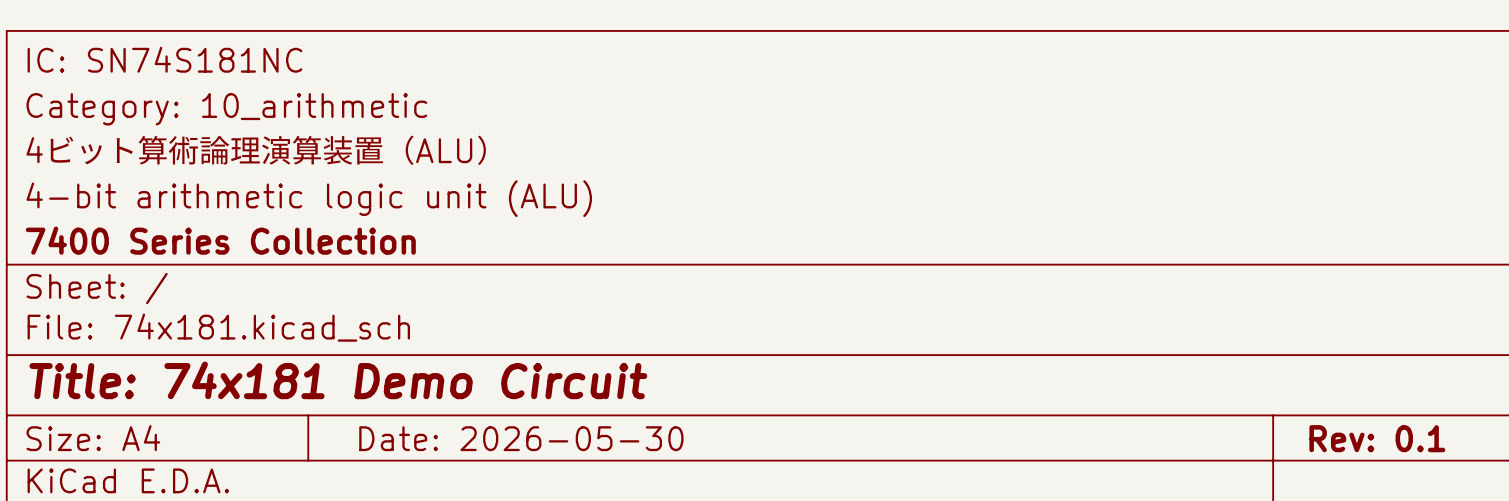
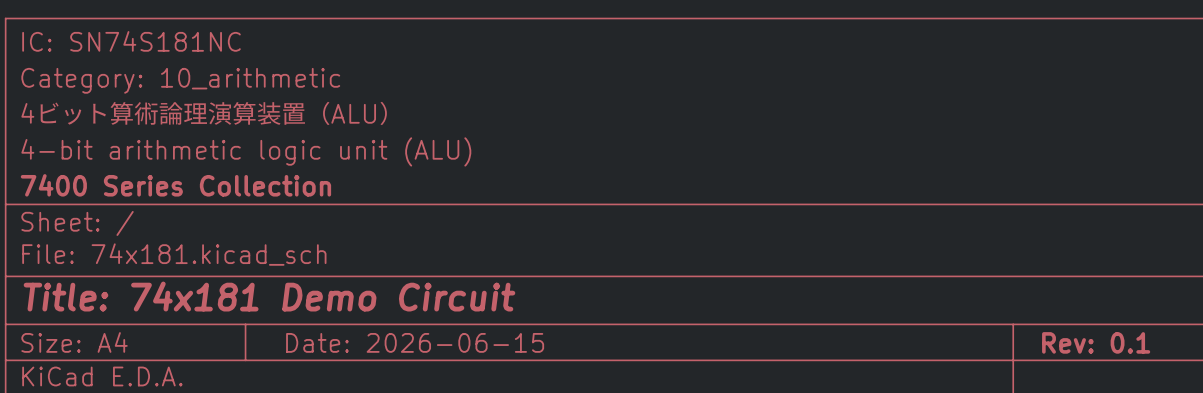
title block: Date: 2026-05-30 (521, 438) -> Date: 2026-06-15 (415, 342)

